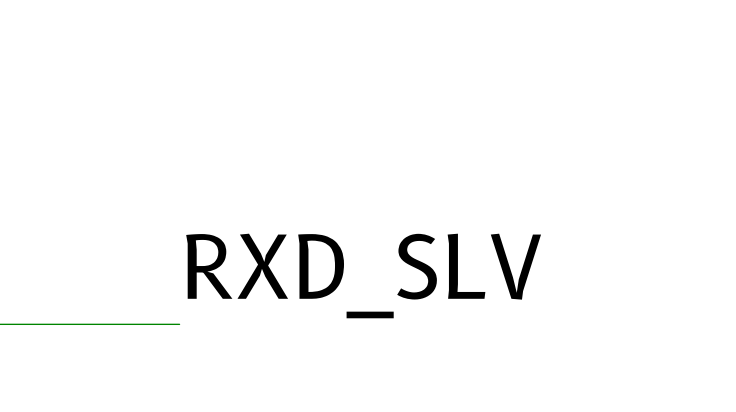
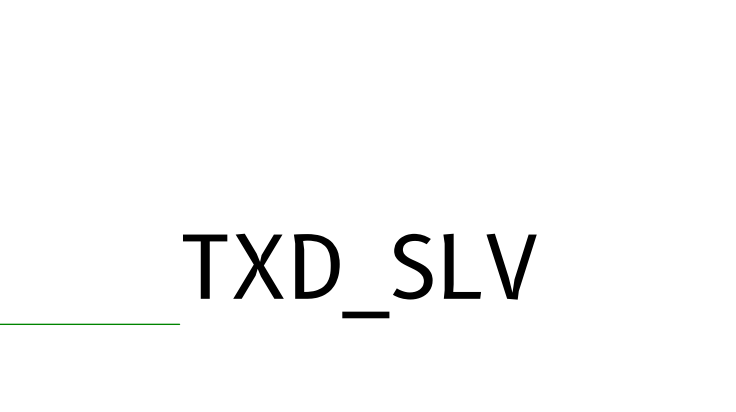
label: RXD_SLV (363, 275) -> TXD_SLV (359, 275)

